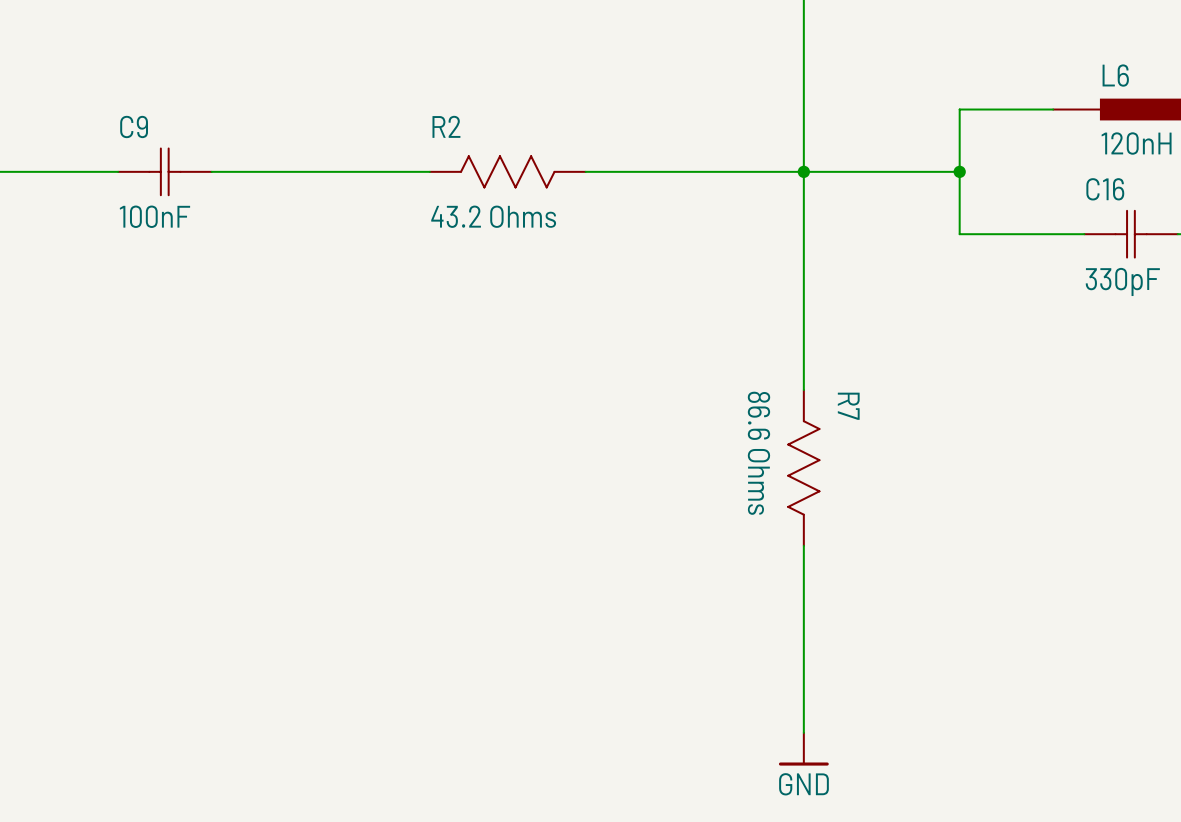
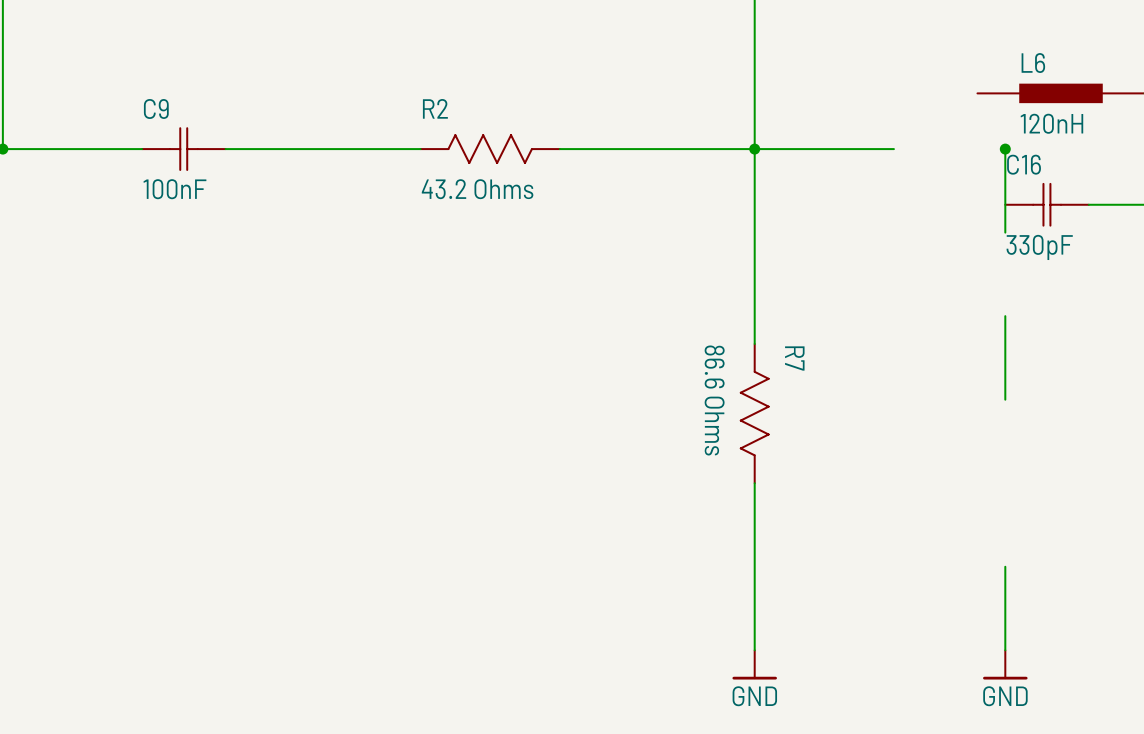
wire: (1053, 109) (959, 109) (959, 234) (1084, 234) -> none
junction: (959, 171) -> none
wire: none -> (1005, 149) (1005, 232)
junction: none -> (1005, 149)
wire: none -> (1005, 316) (1005, 399)
wire: none -> (1005, 566) (1005, 650)
power symbol: none -> GND (1005, 664)

